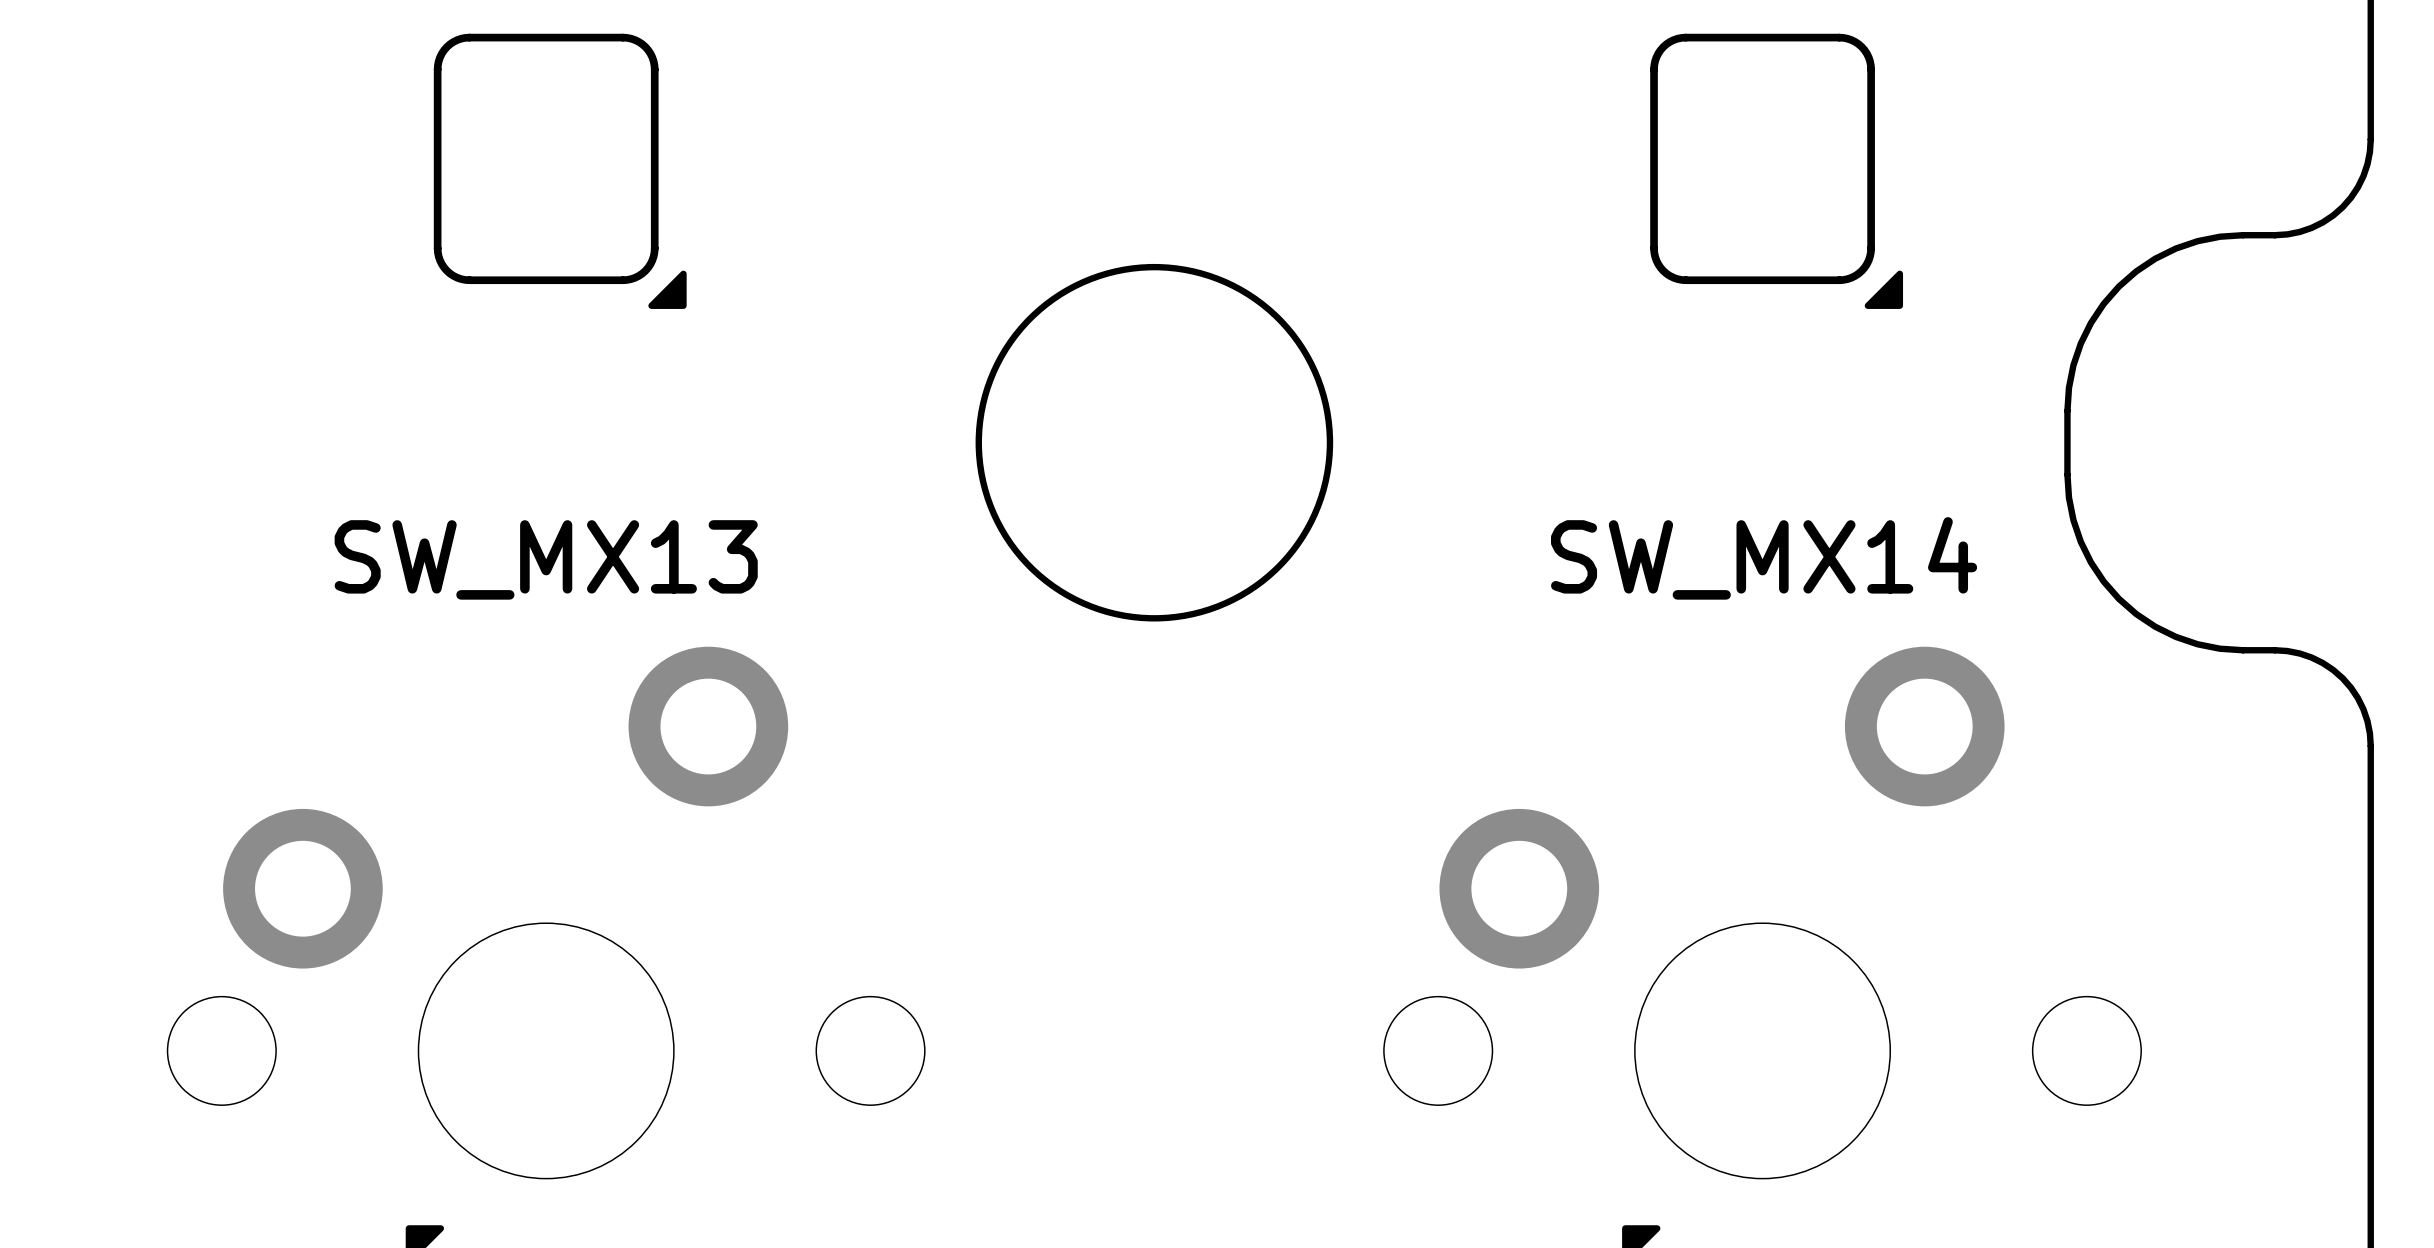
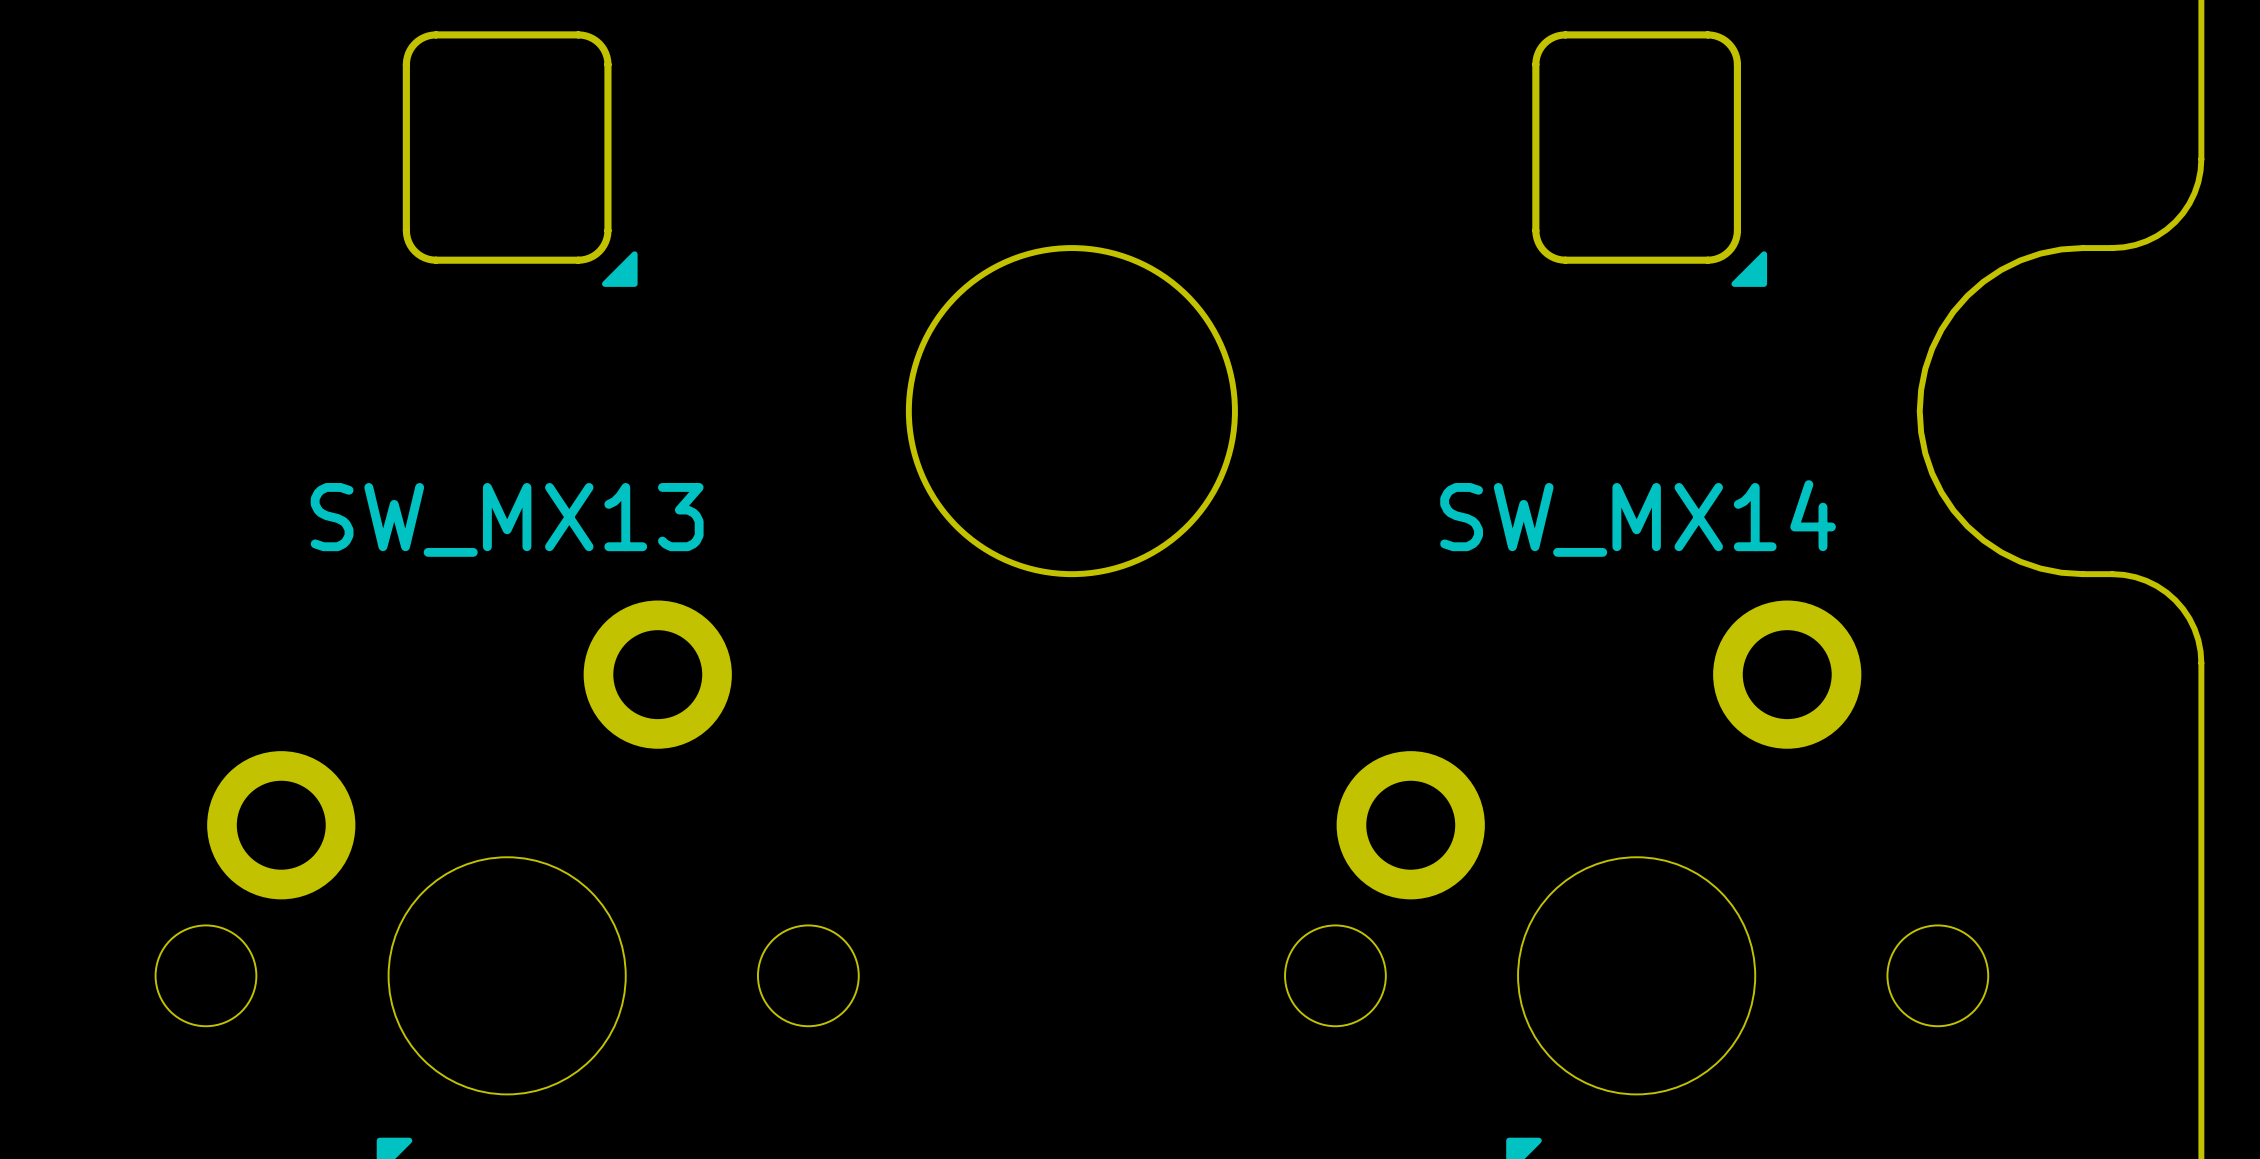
board edge: (2370, 139) (2367, 164) (2357, 187) (2342, 207) (2322, 222) (2299, 231) (2287, 234) (2220, 236) (2197, 241) (2175, 248) (2155, 258) (2136, 271) (2118, 286) (2103, 303) (2090, 323) (2080, 343) (2073, 365) (2068, 387) (2067, 410) (2068, 497) (2073, 520) (2080, 541) (2090, 562) (2103, 581) (2118, 598) (2136, 613) (2155, 626) (2175, 636) (2197, 644) (2220, 648) (2274, 650) -> (2201, 129) (2200, 170) (2194, 193) (2182, 213) (2166, 229) (2156, 236) (2135, 245) (2112, 248) (2061, 249) (2040, 253) (2001, 269) (1983, 281) (1953, 311) (1932, 348) (1925, 368) (1921, 389) (1921, 432) (1932, 473) (1953, 510) (1983, 540) (2020, 561) (2061, 572) (2082, 574)
board edge: (2274, 650) (2287, 651) (2311, 657) (2322, 663) (2342, 678) (2357, 698) (2363, 709) (2367, 721) (2370, 746) -> (2082, 574) (2112, 574) (2135, 577) (2156, 586) (2175, 600) (2189, 618) (2198, 640) (2201, 663) (2201, 692)

